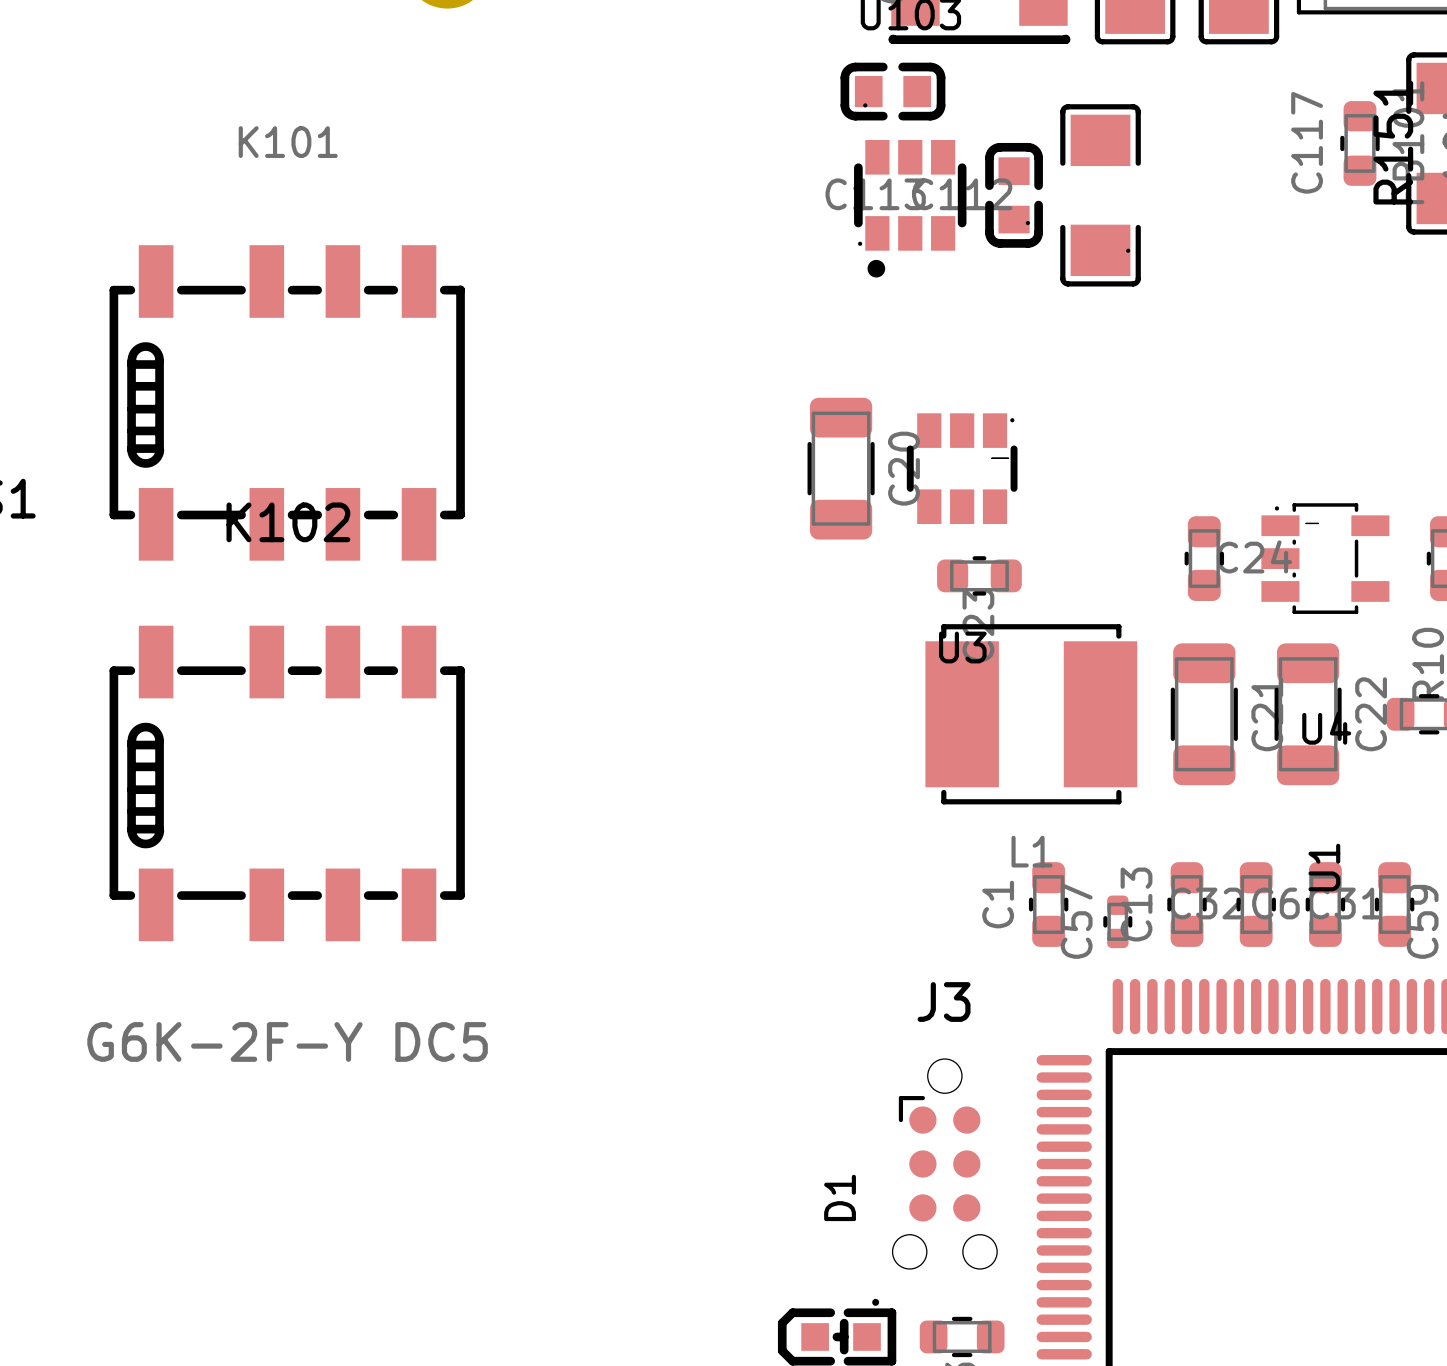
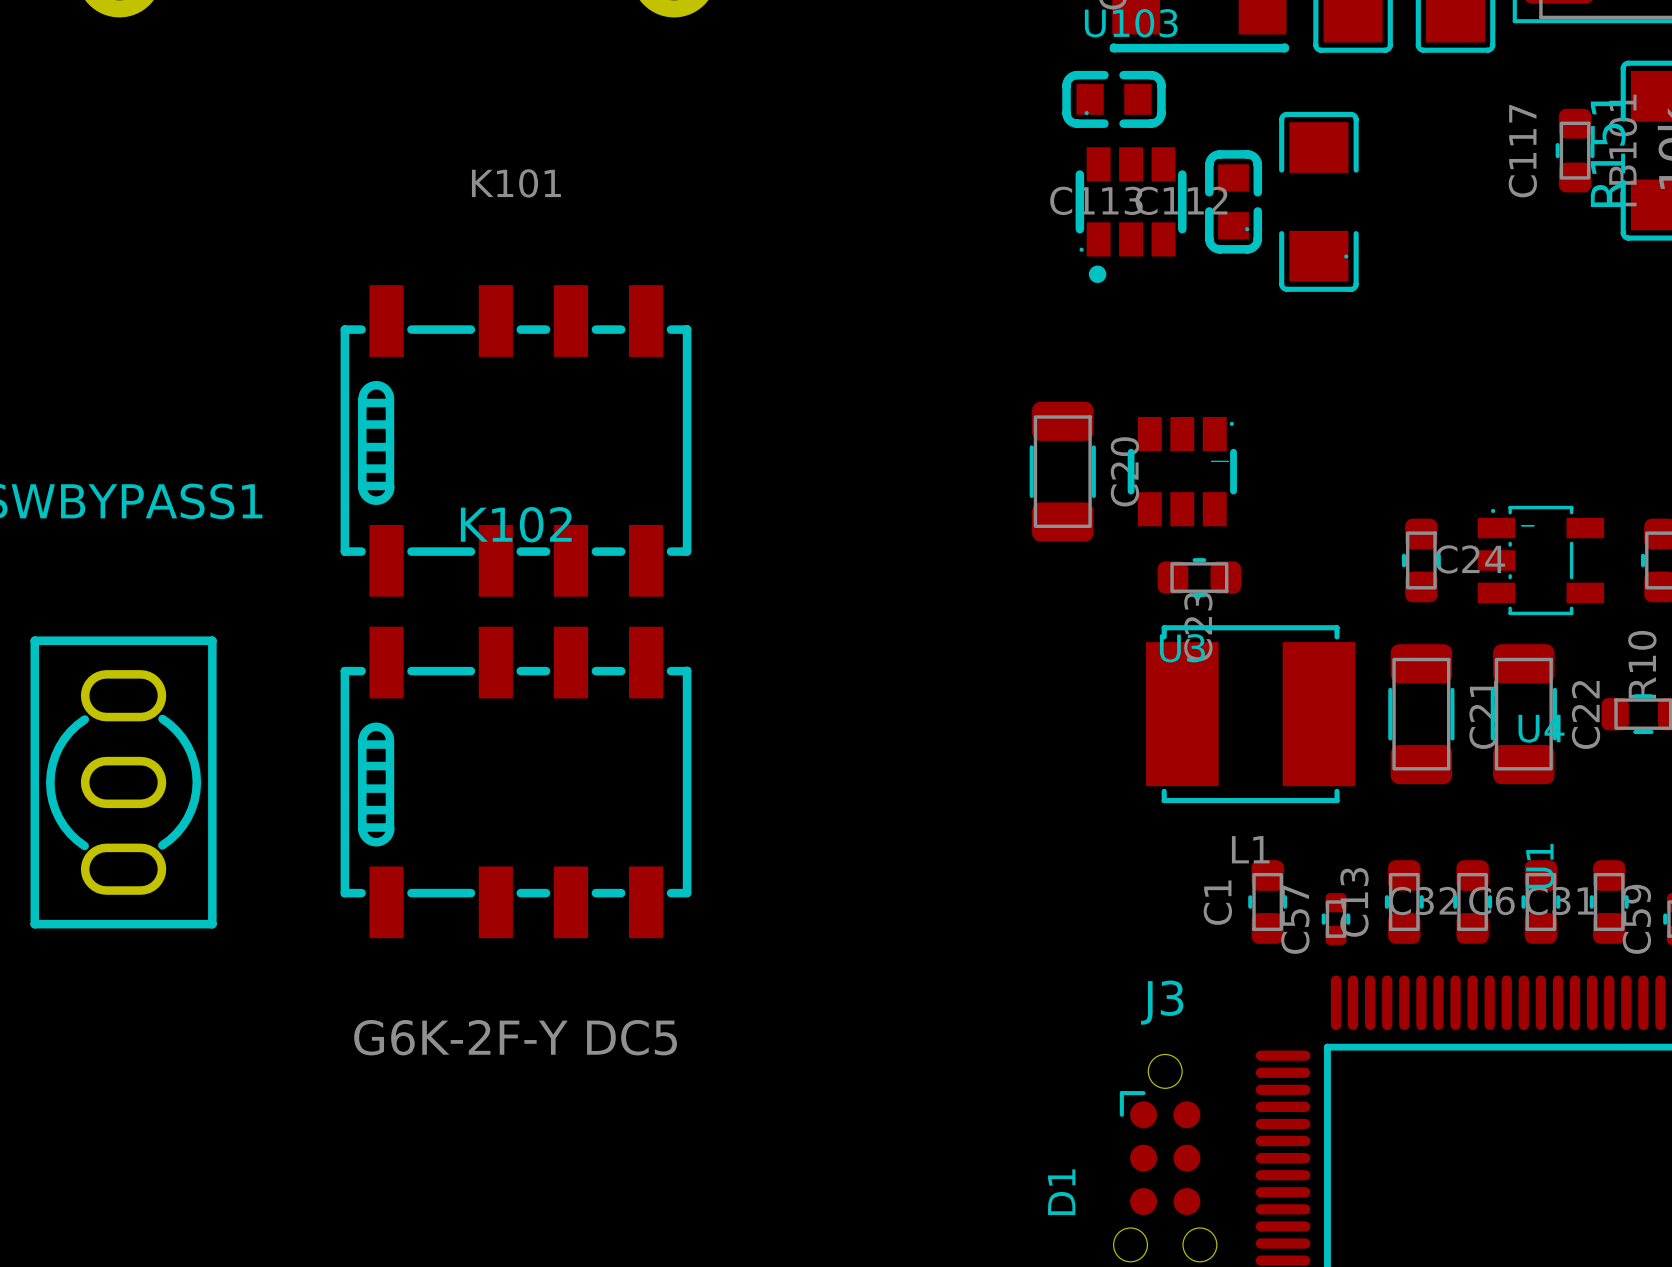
K101 position: (287, 402) -> (515, 440)

